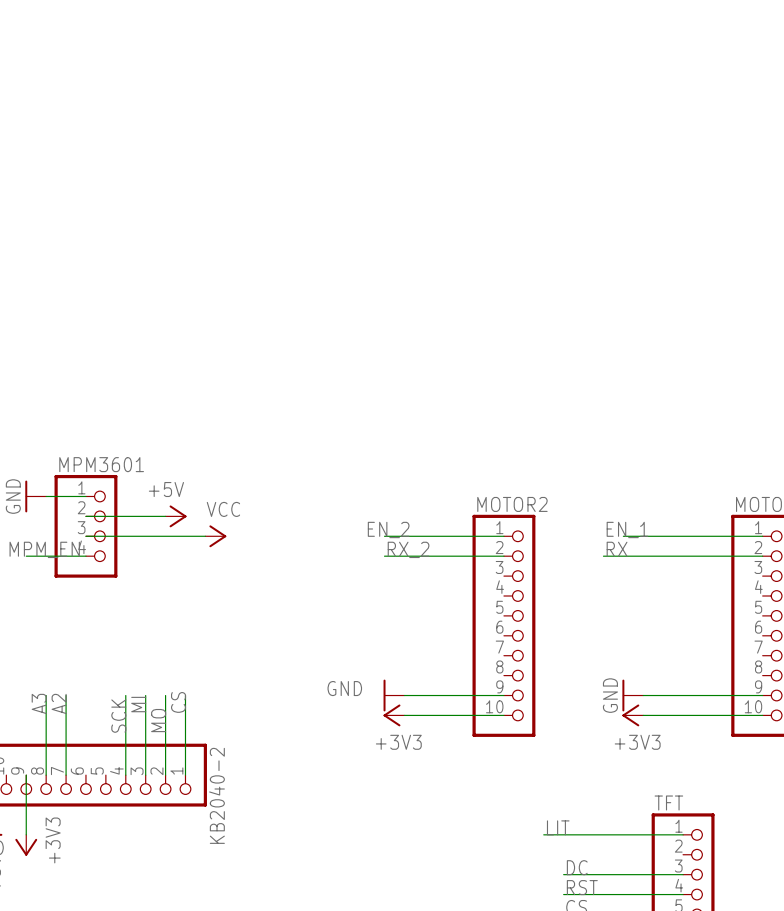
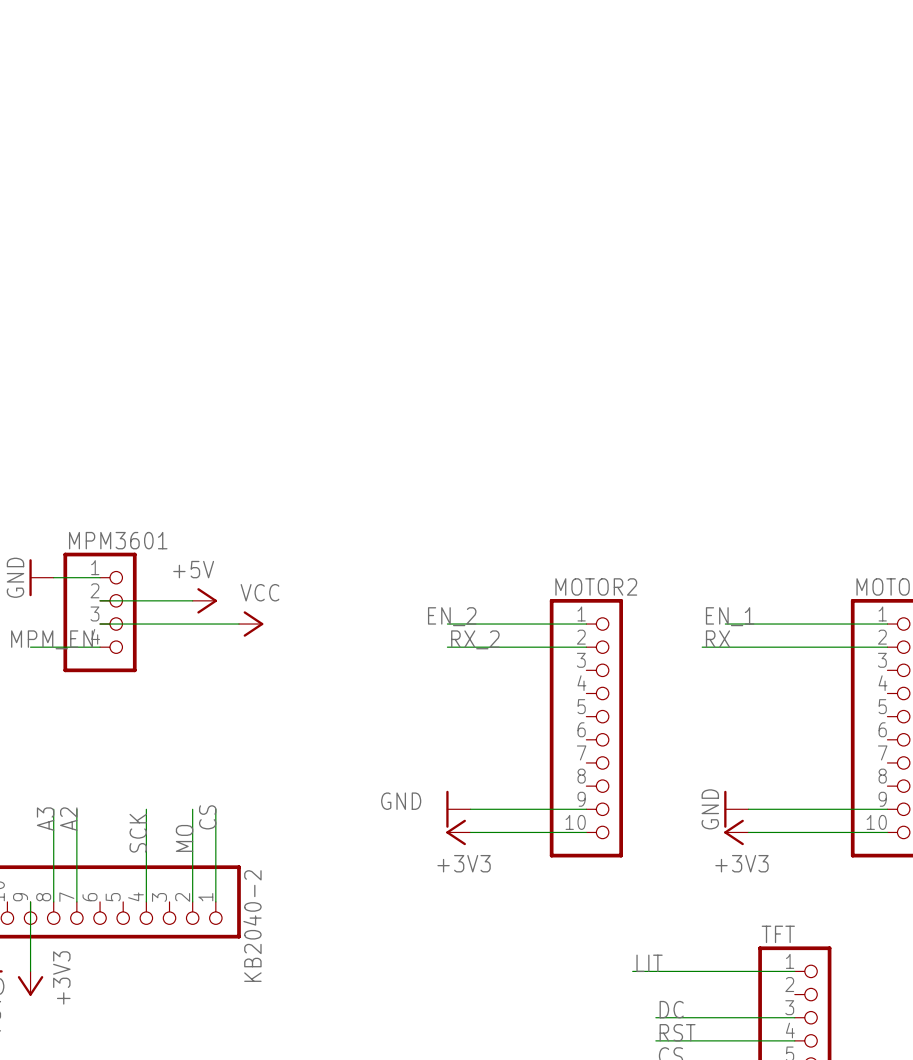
wire: (145, 695) (145, 775) -> none
label: MI (138, 704) -> none

